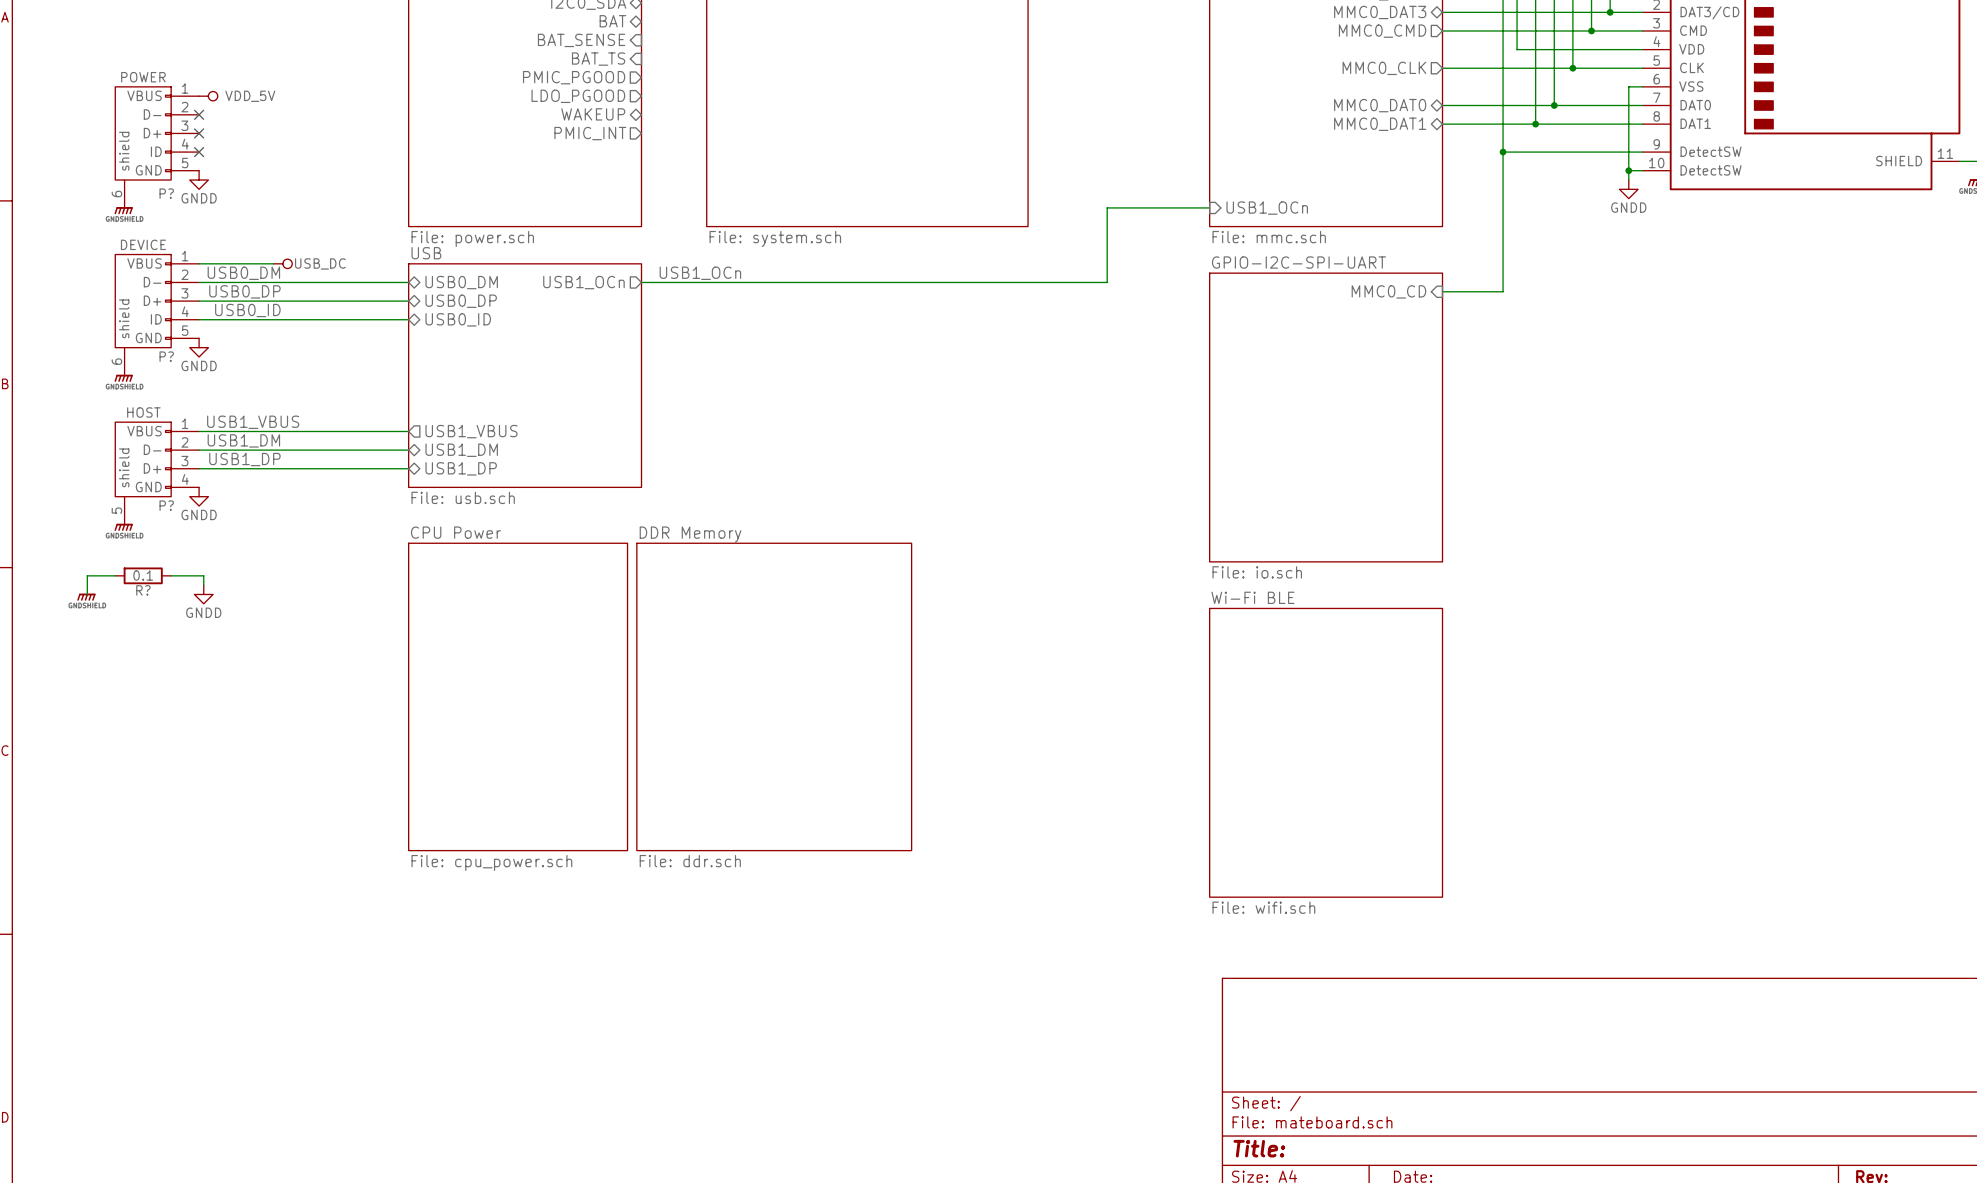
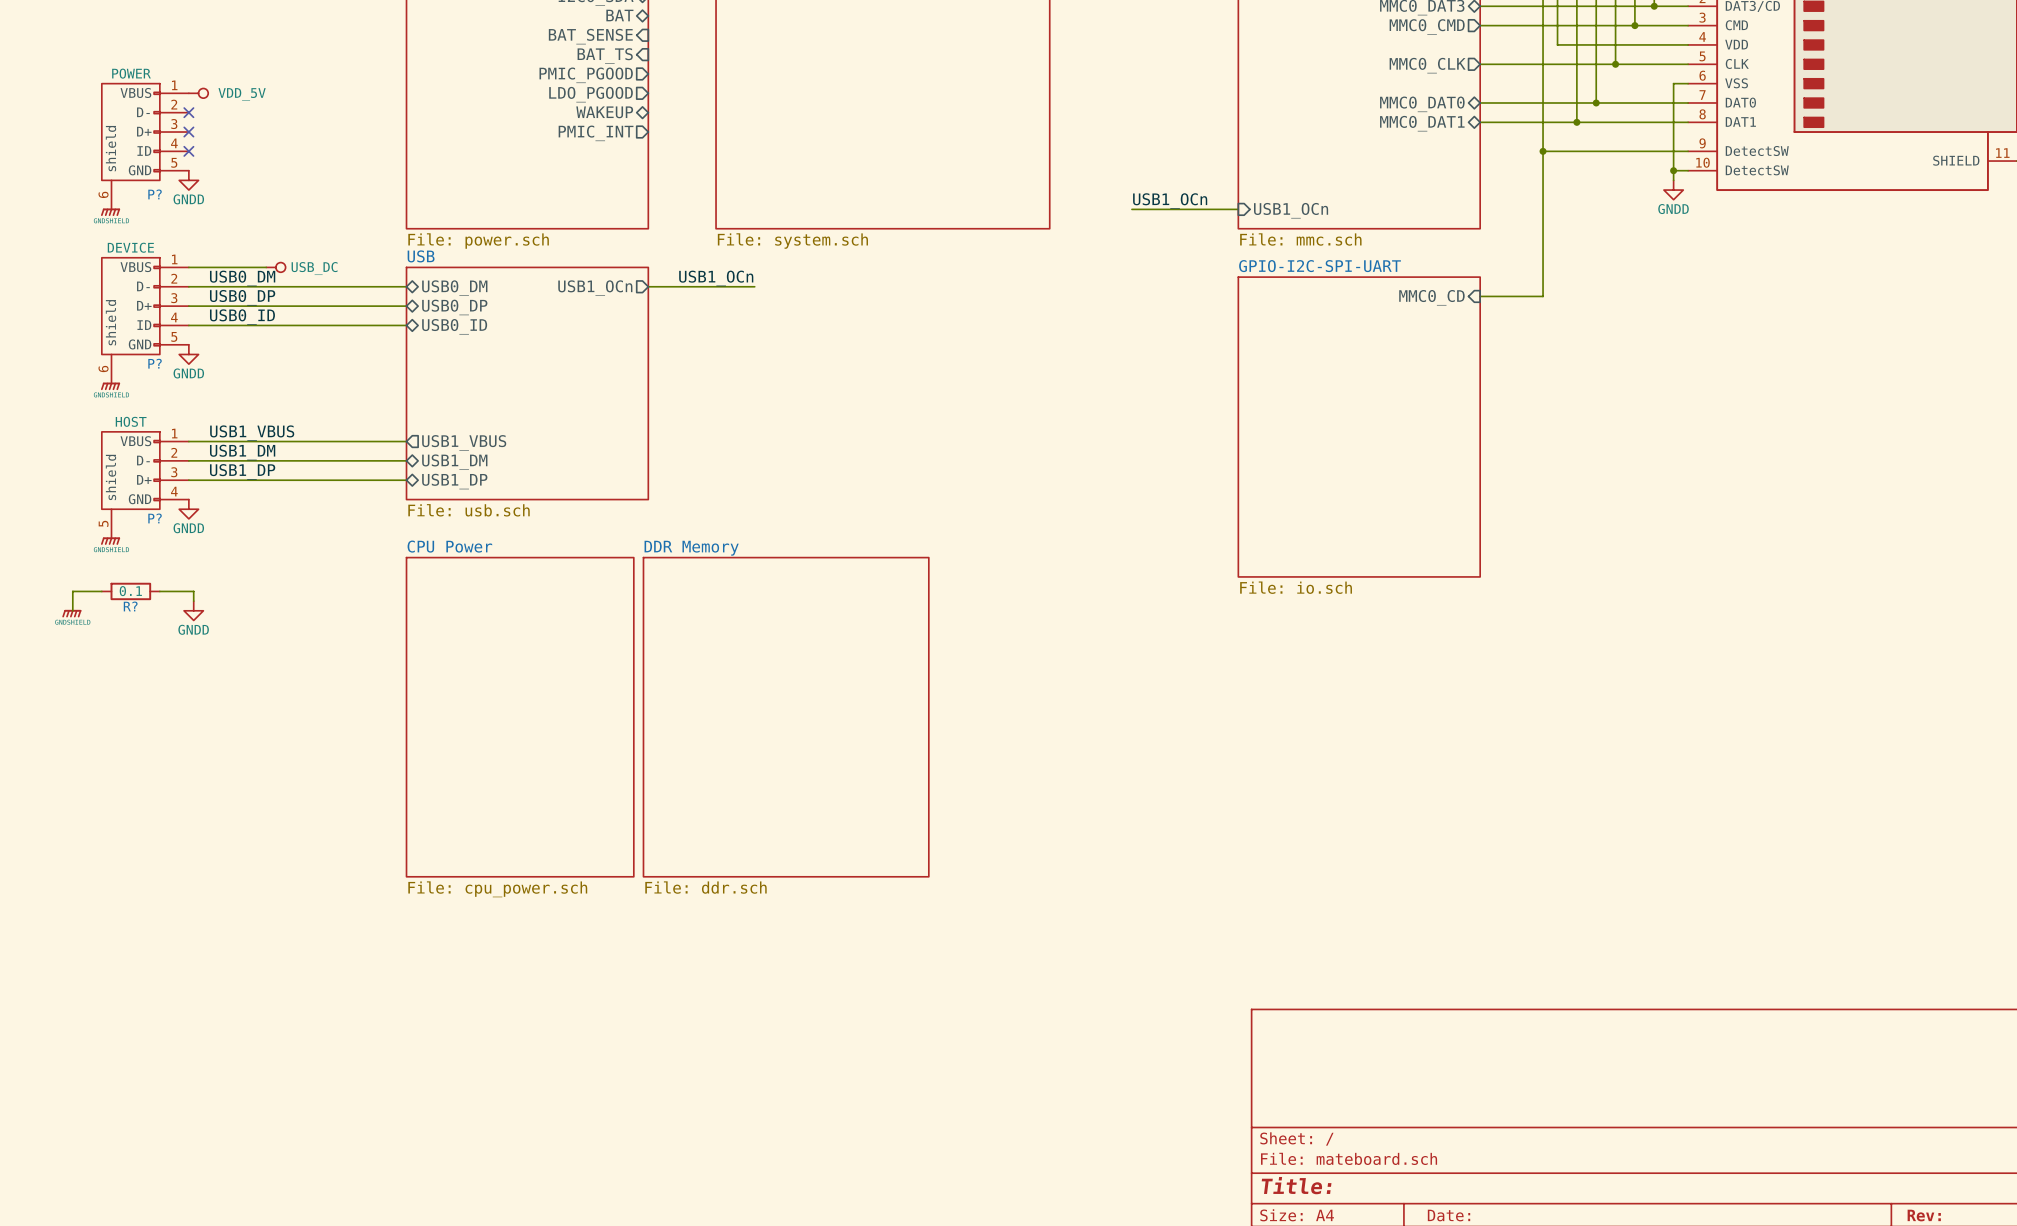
label: none -> USB1_OCn (1170, 201)
wire: (1107, 207) (1107, 282) (743, 282) -> none
sheet Wi-Fi BLE: File: wifi.sch (1326, 752) -> none

